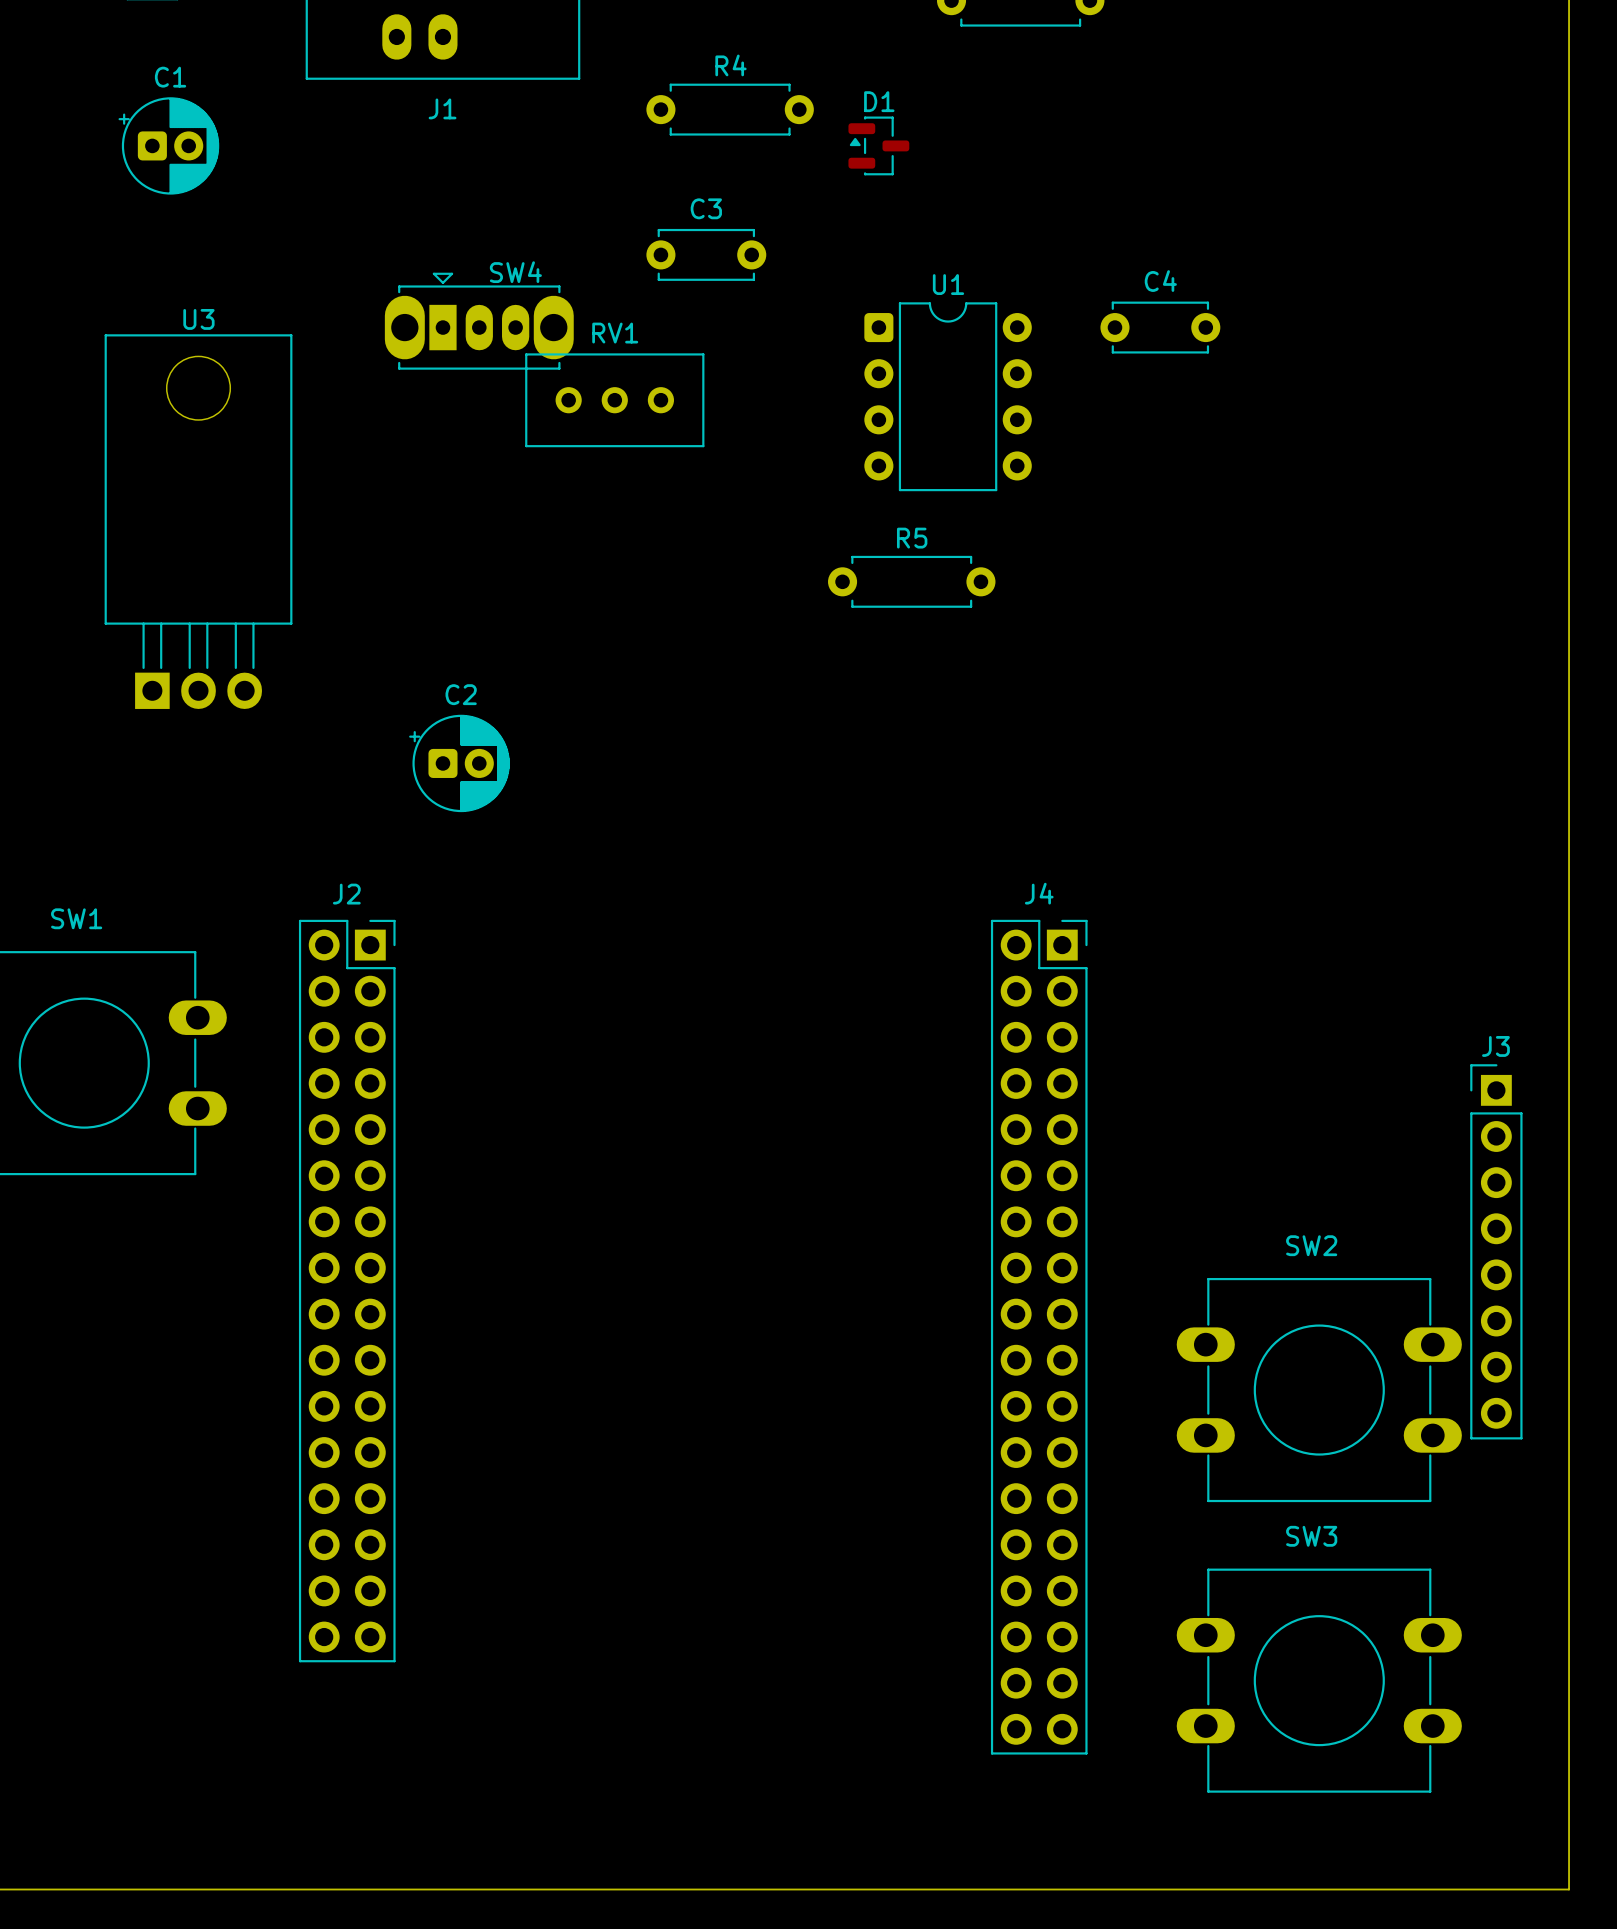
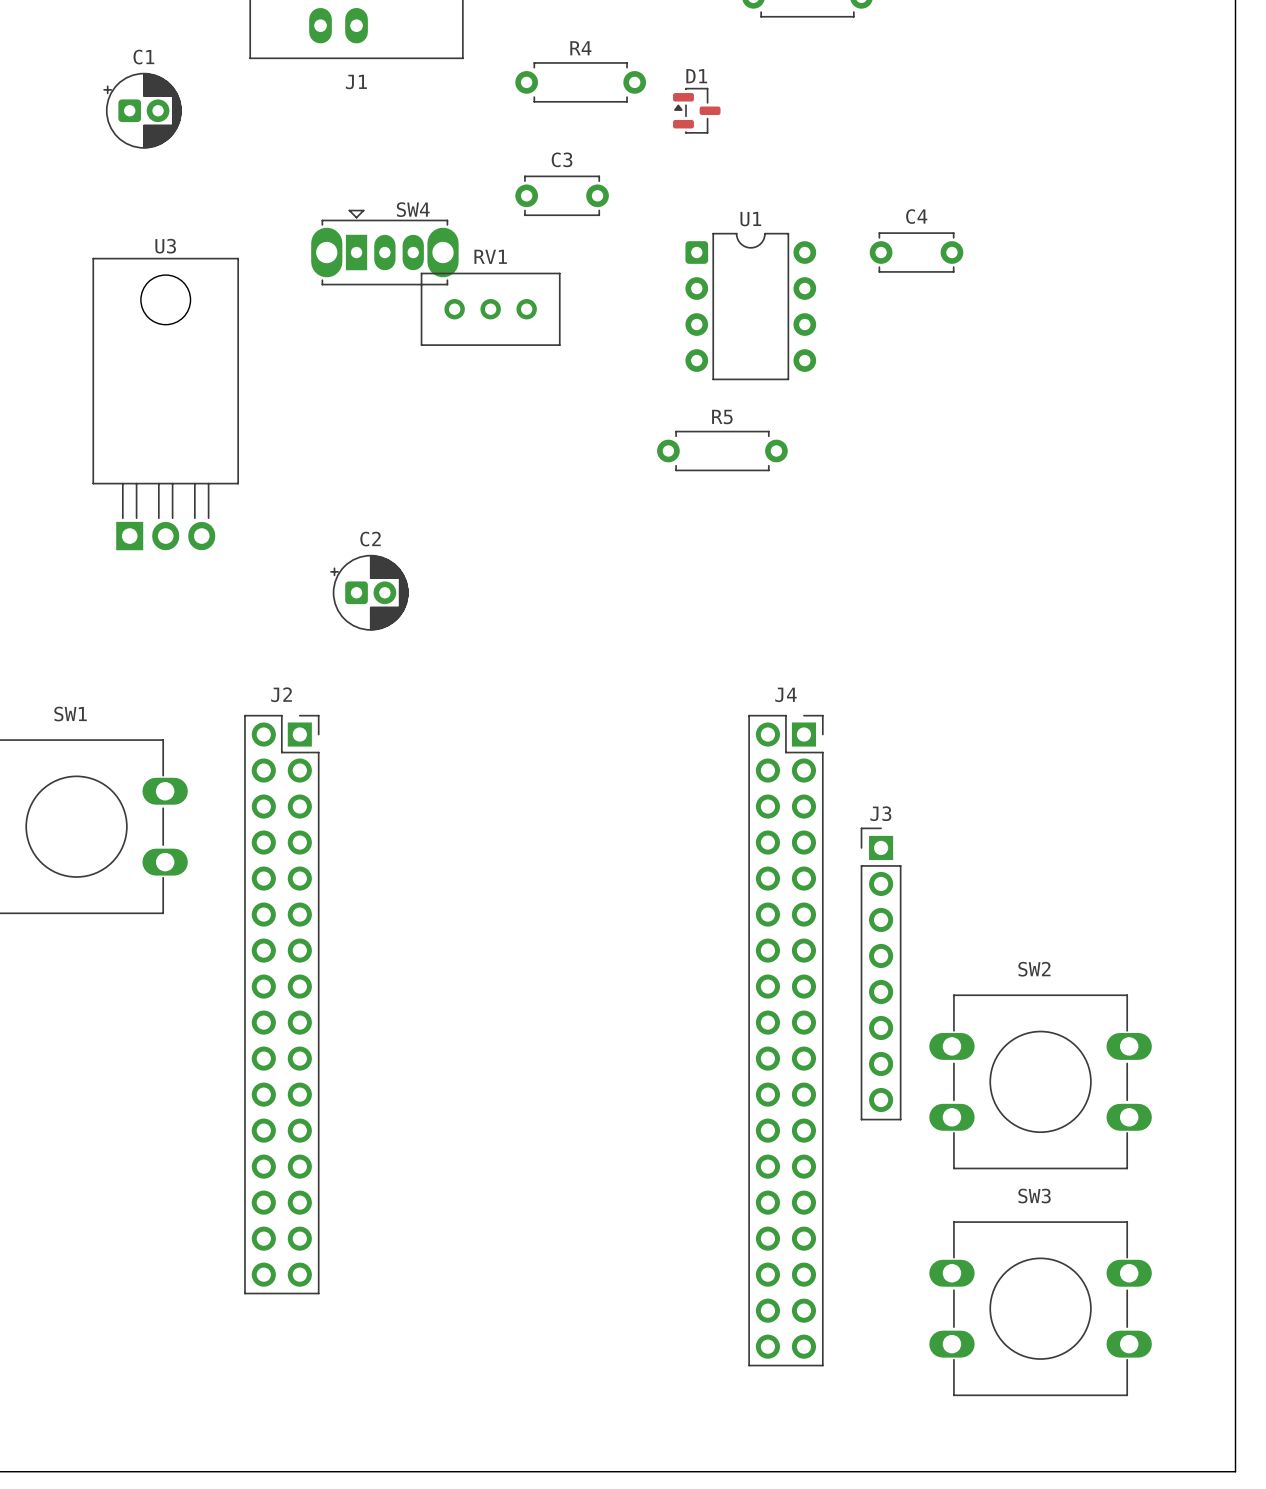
J3 position: (1496, 1251) -> (881, 973)
J4 position: (1039, 1337) -> (785, 1040)

